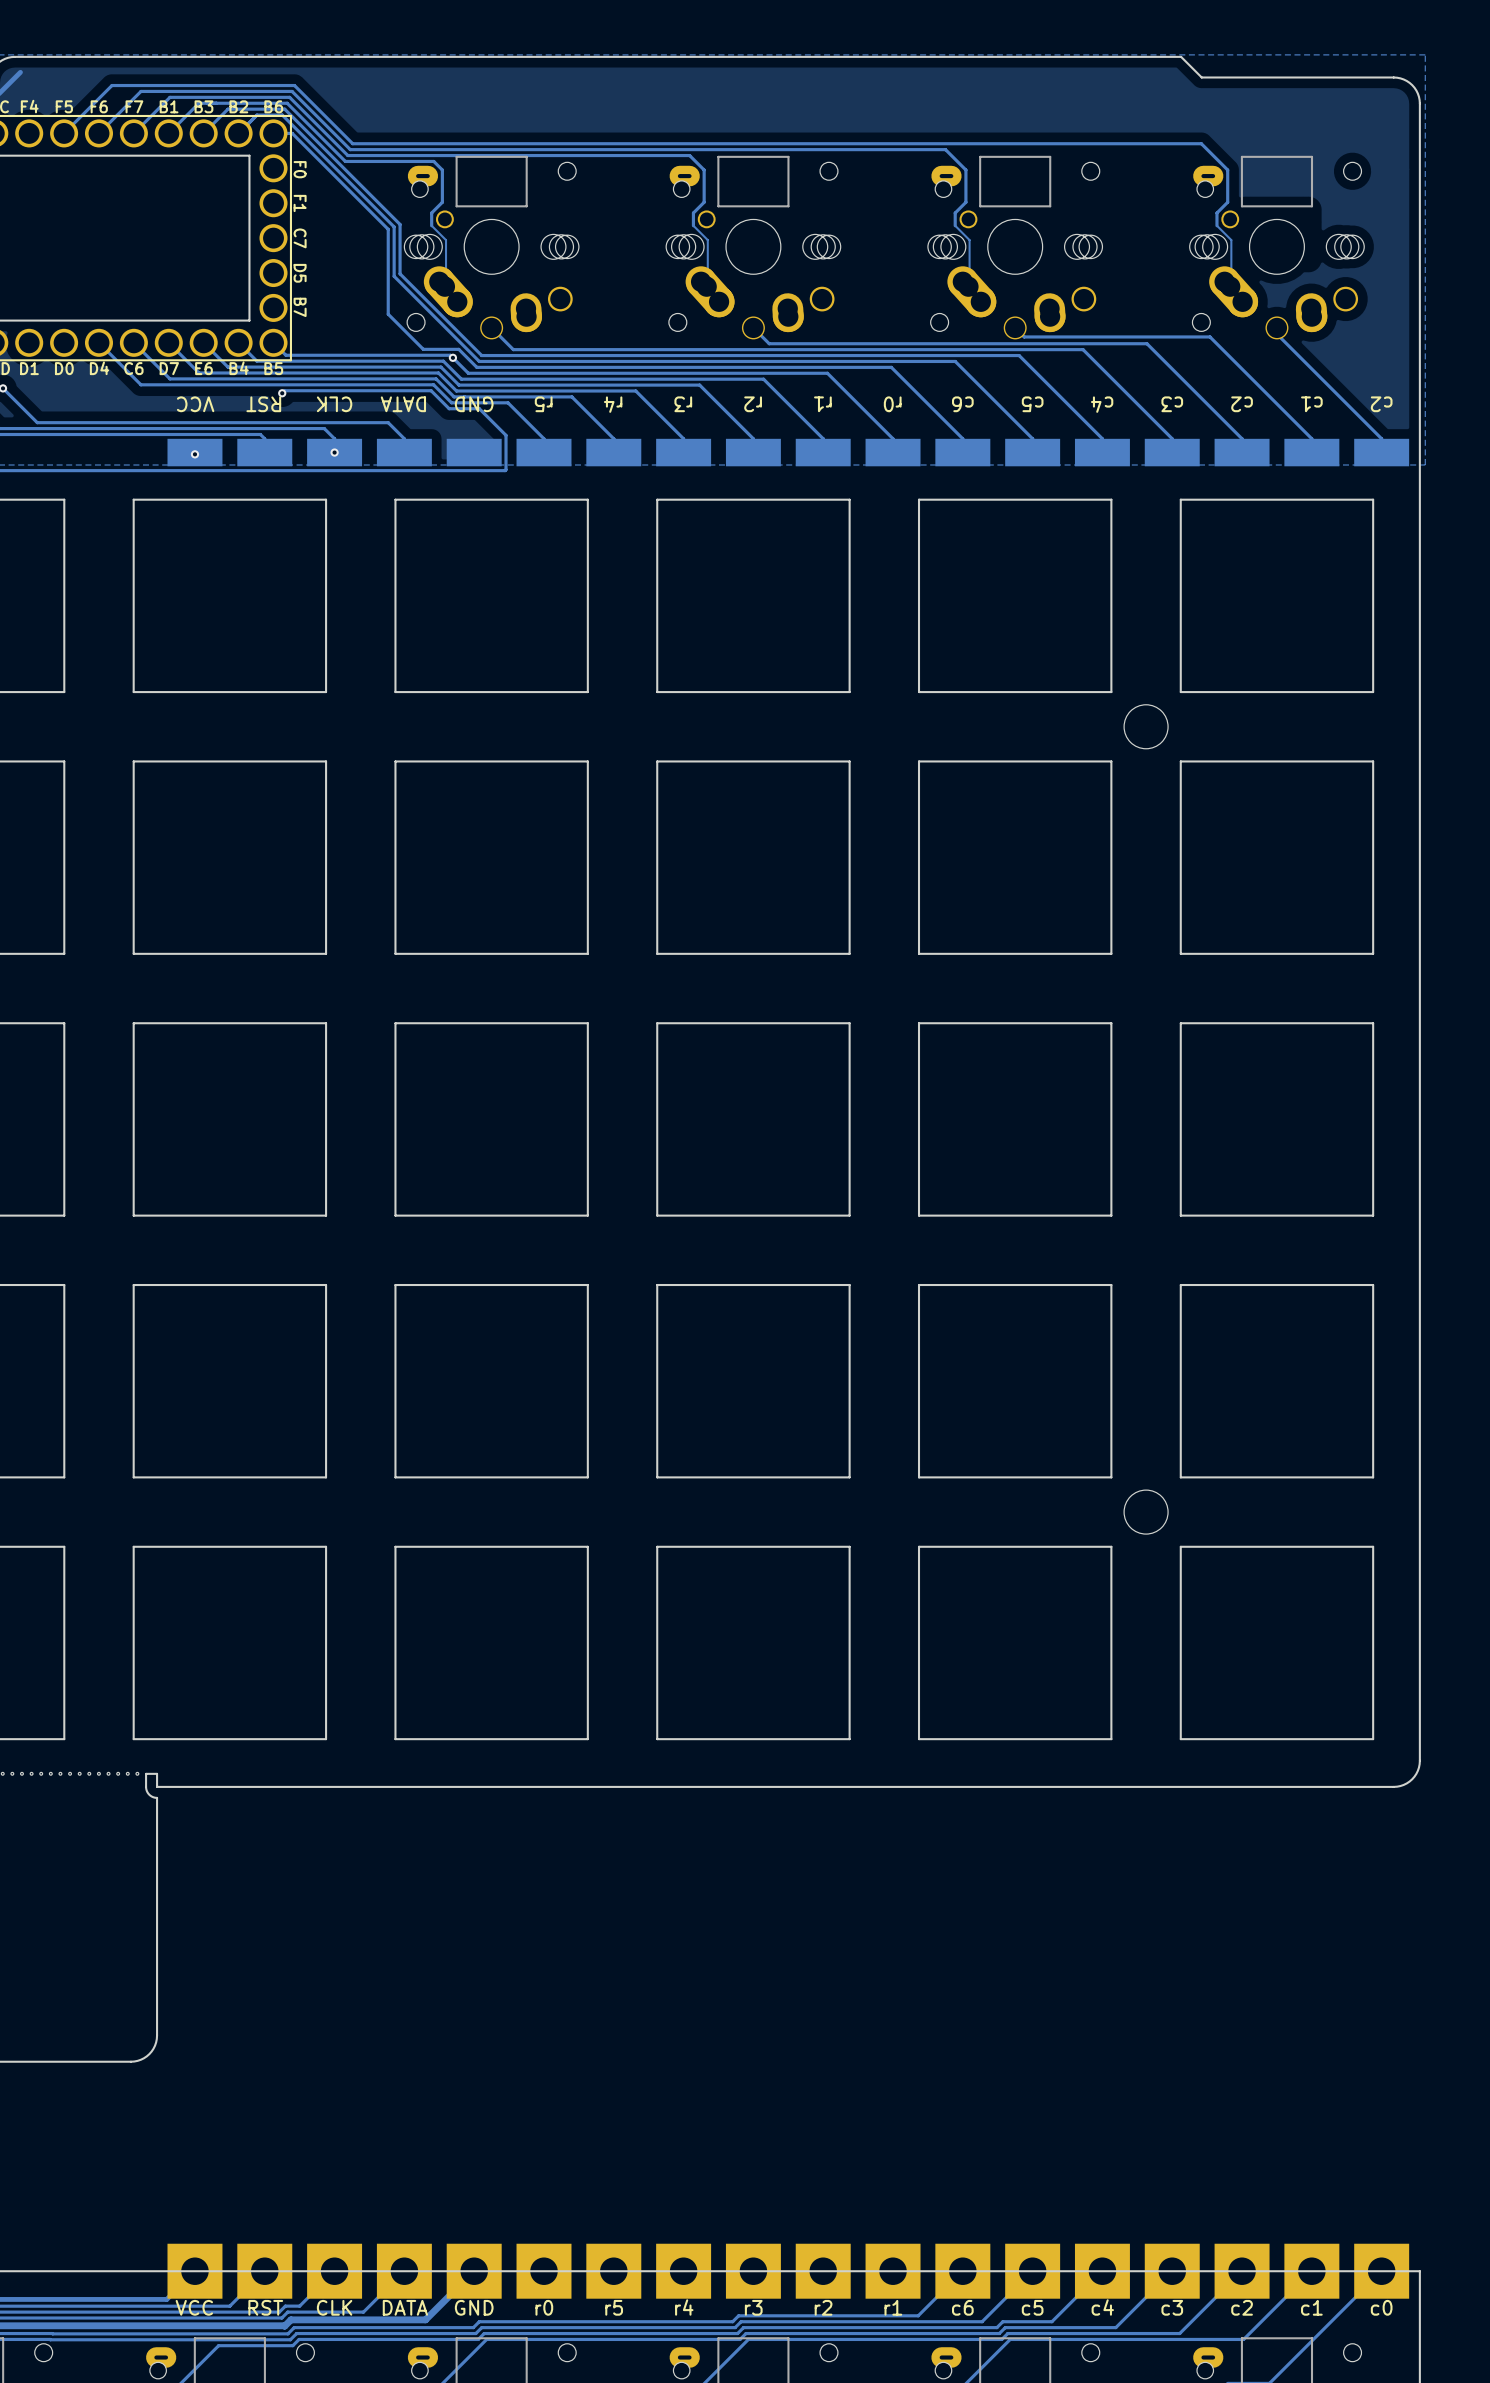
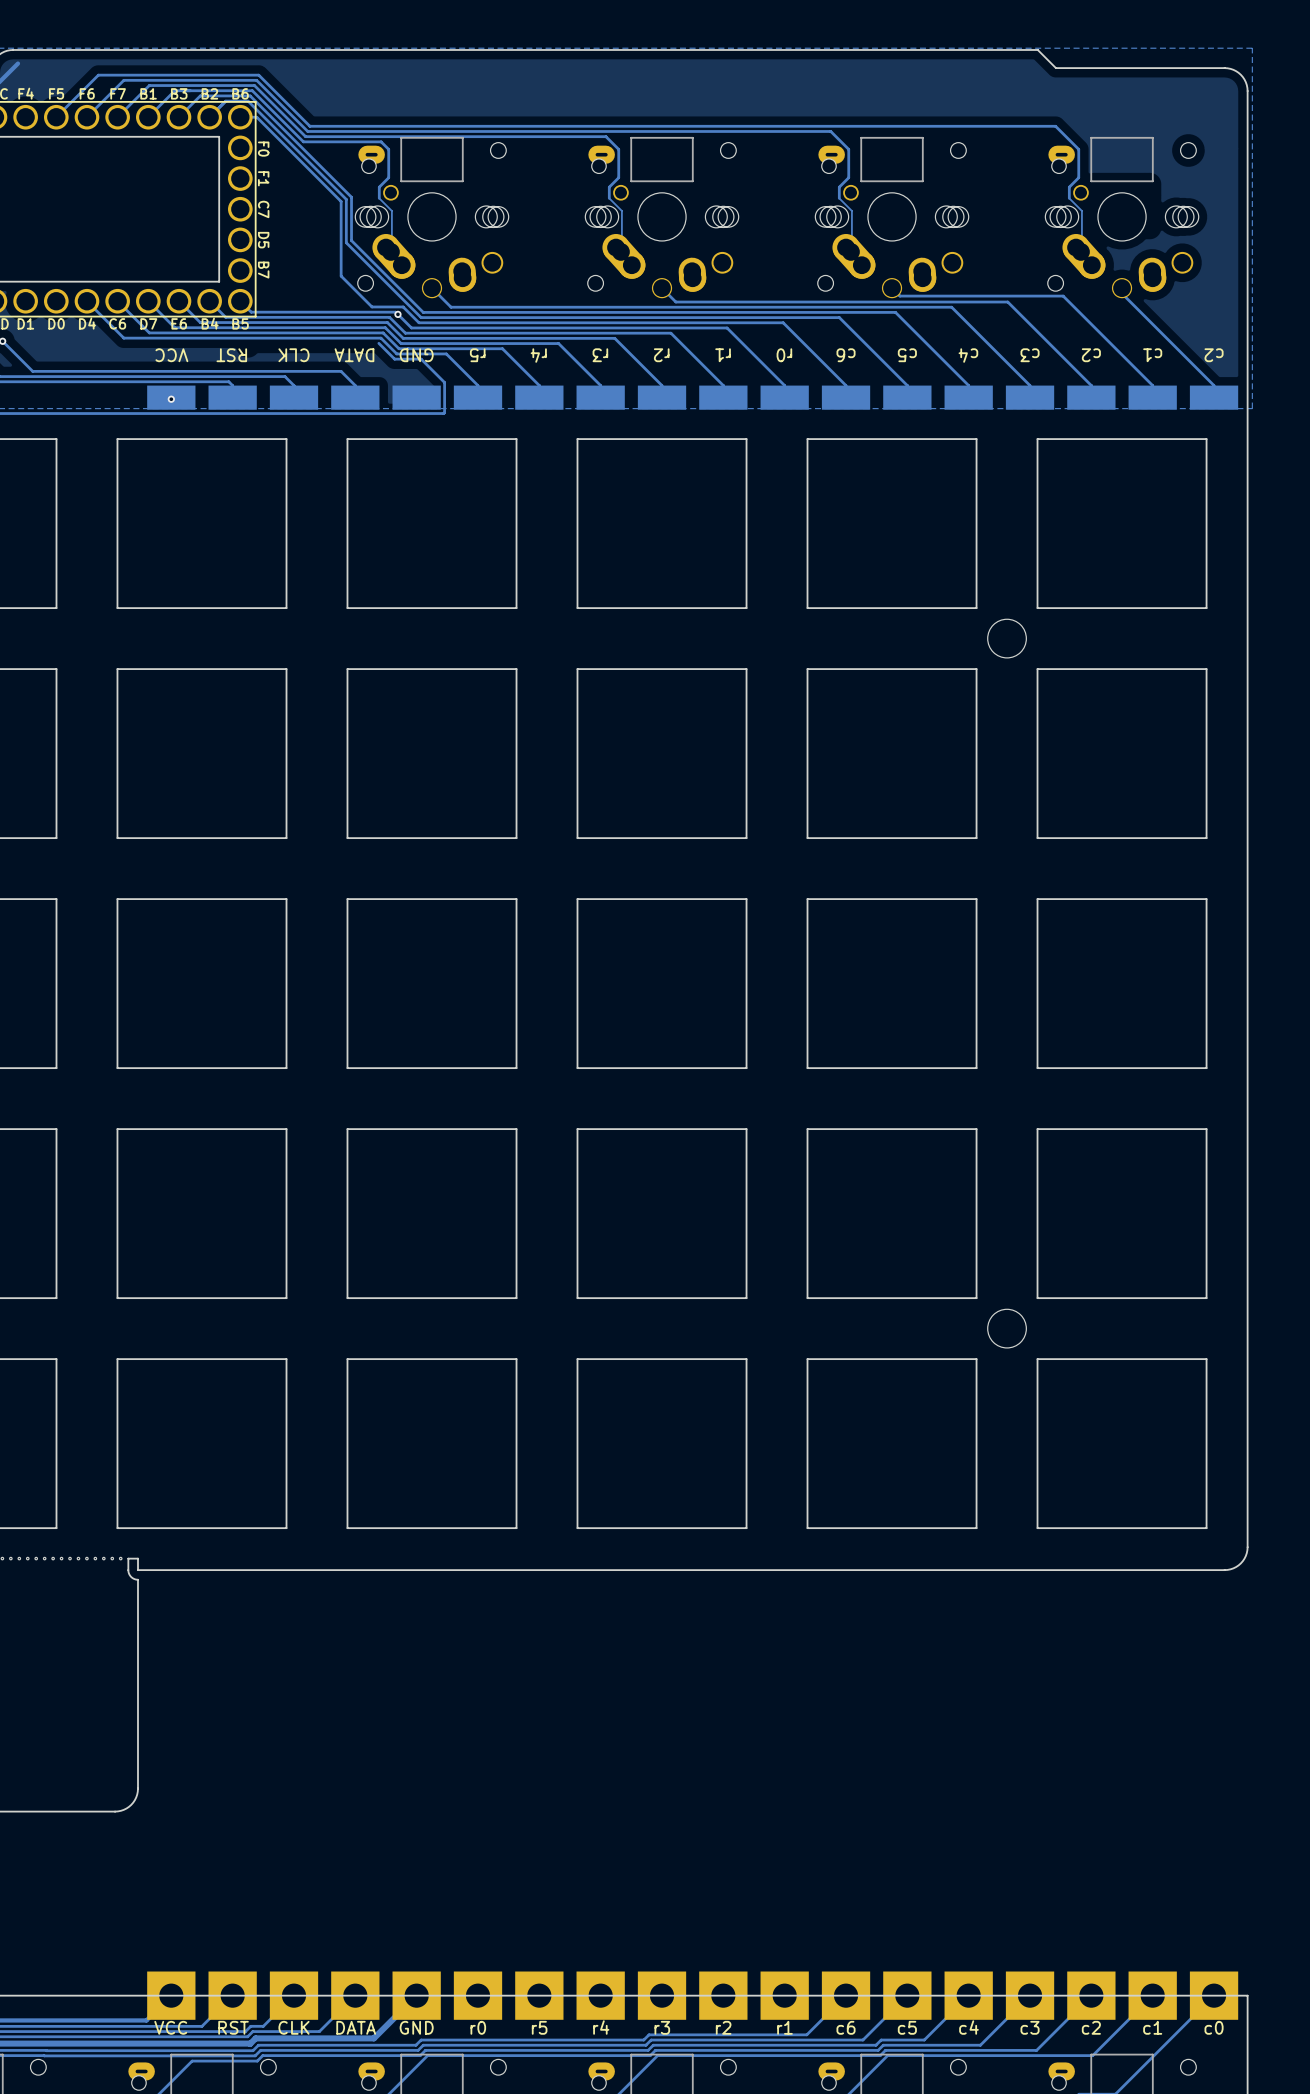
track: (431, 390) (284, 390) (282, 393) -> none
via: (282, 393) -> none
via: (334, 452) -> none

